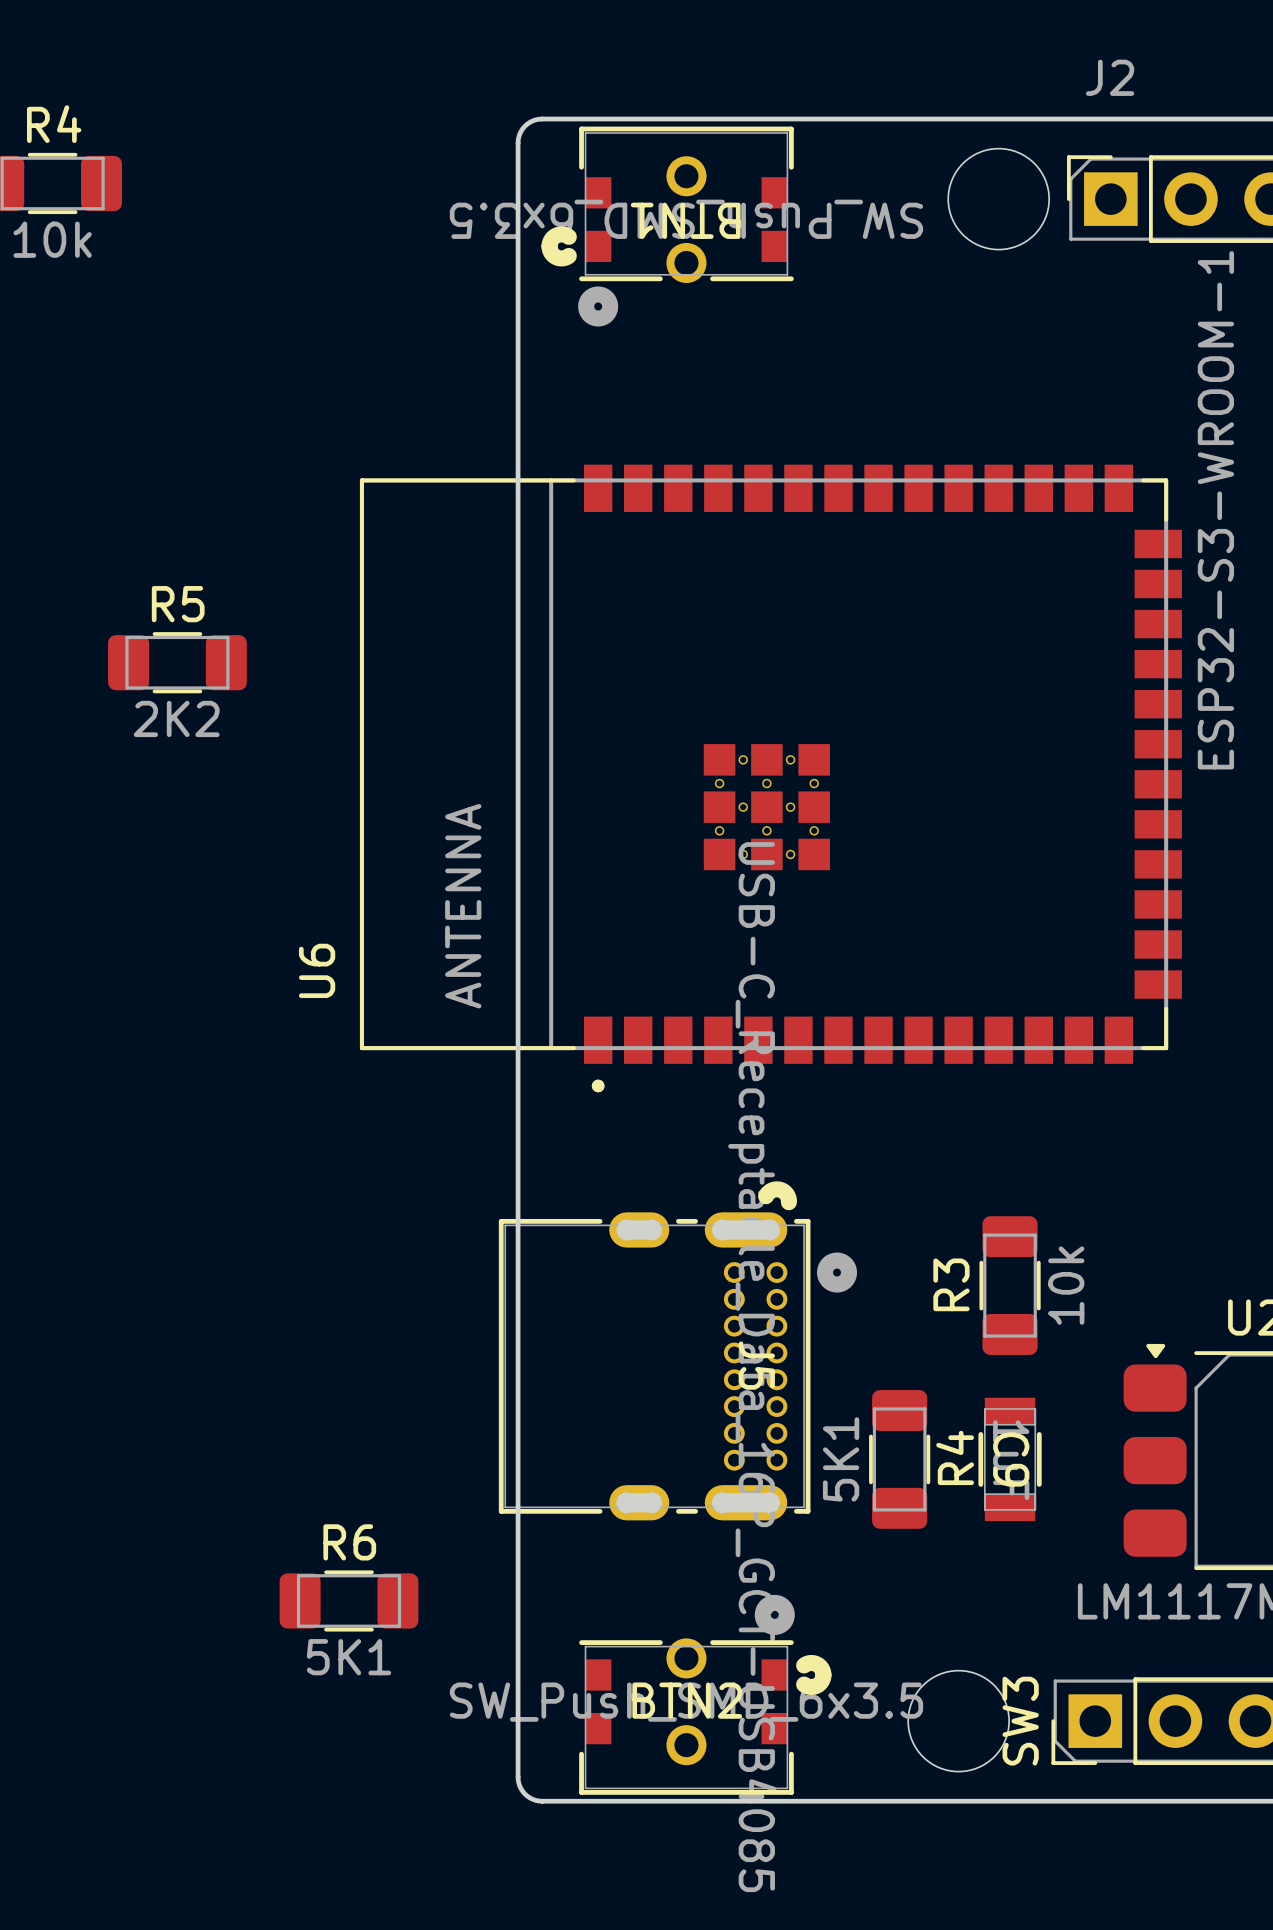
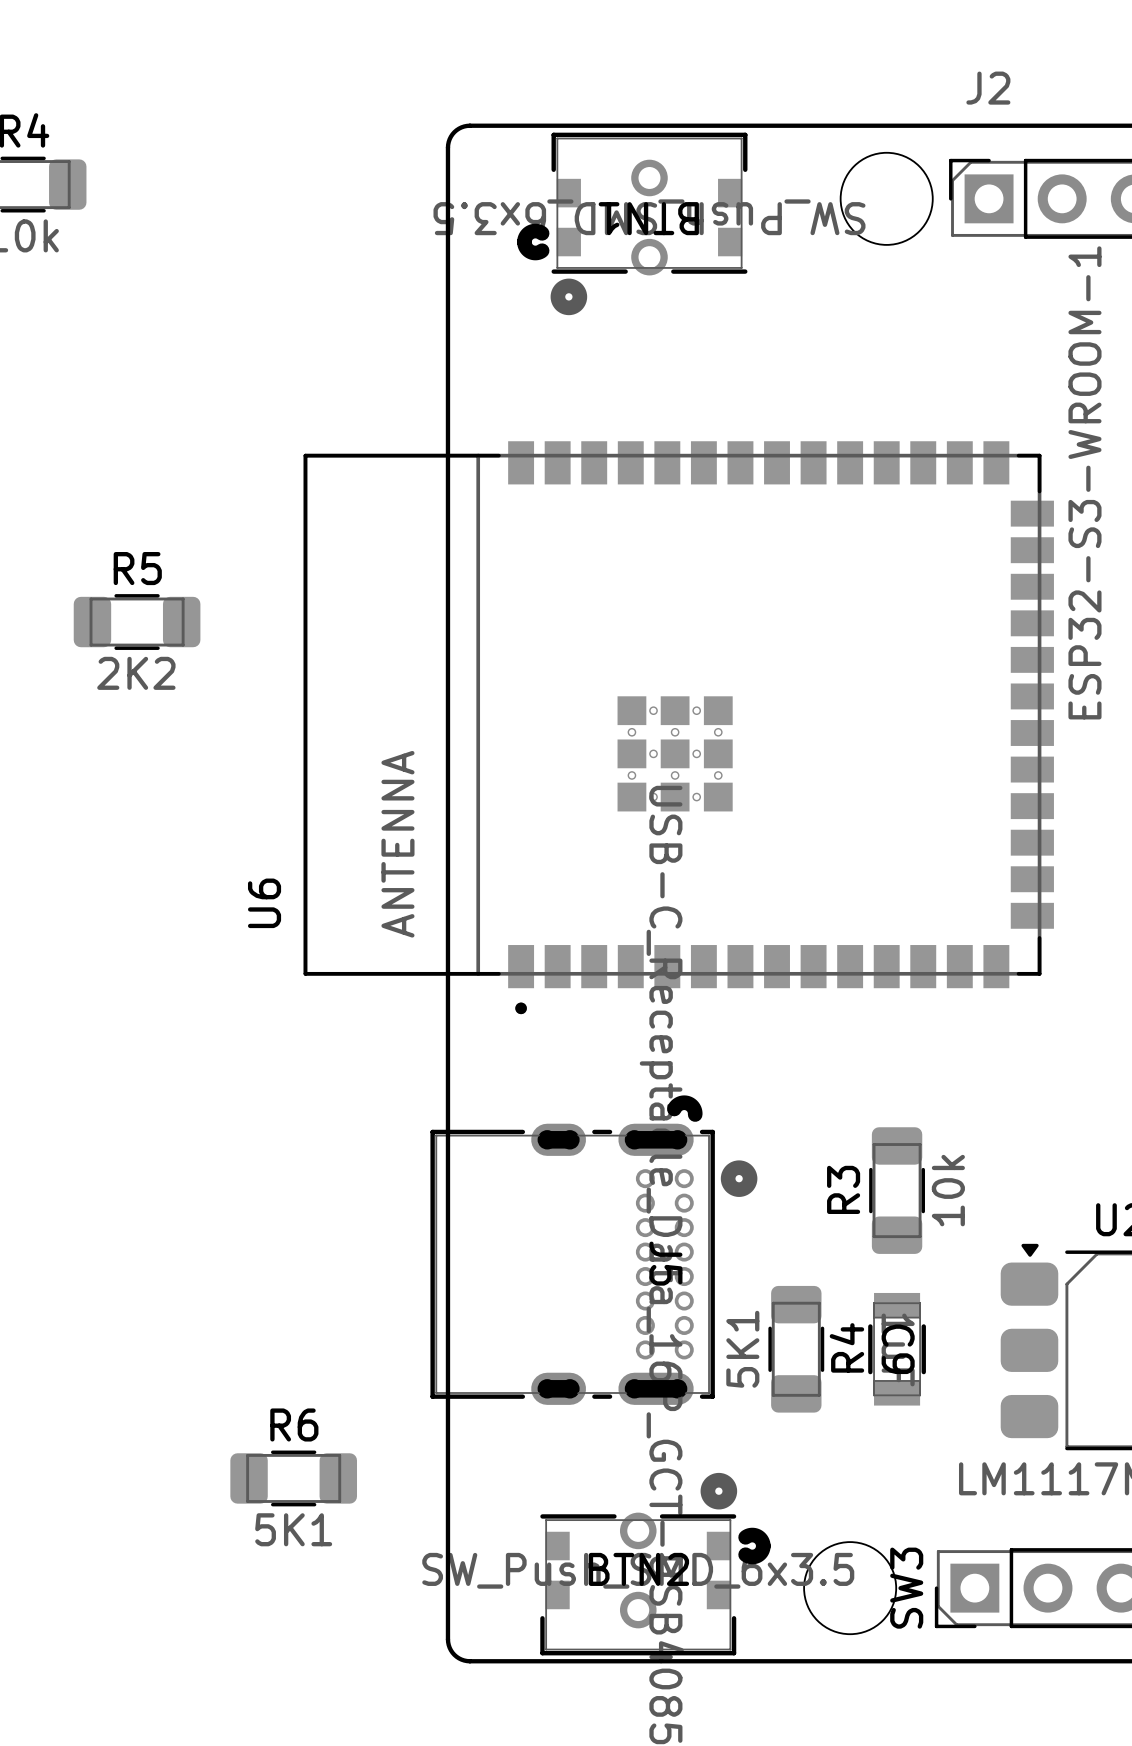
BTN1 position: (667, 226) -> (632, 223)
BTN2 position: (705, 1694) -> (655, 1564)

